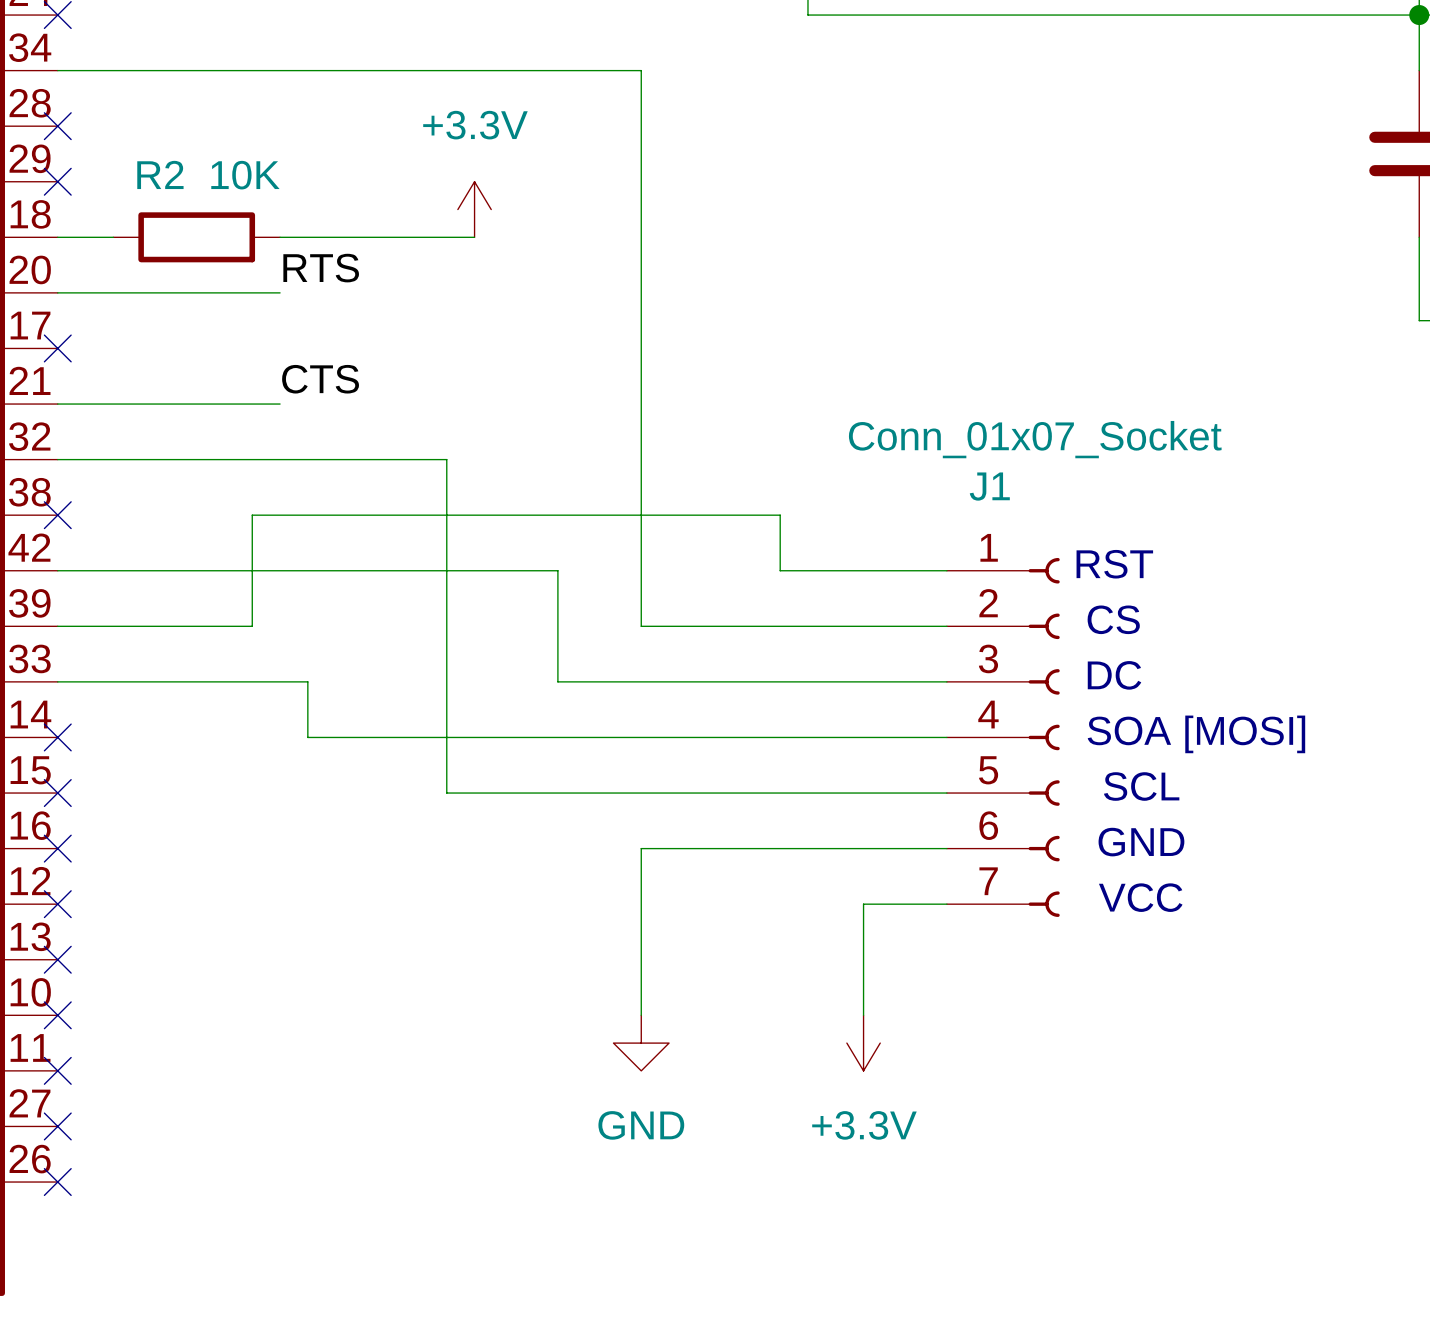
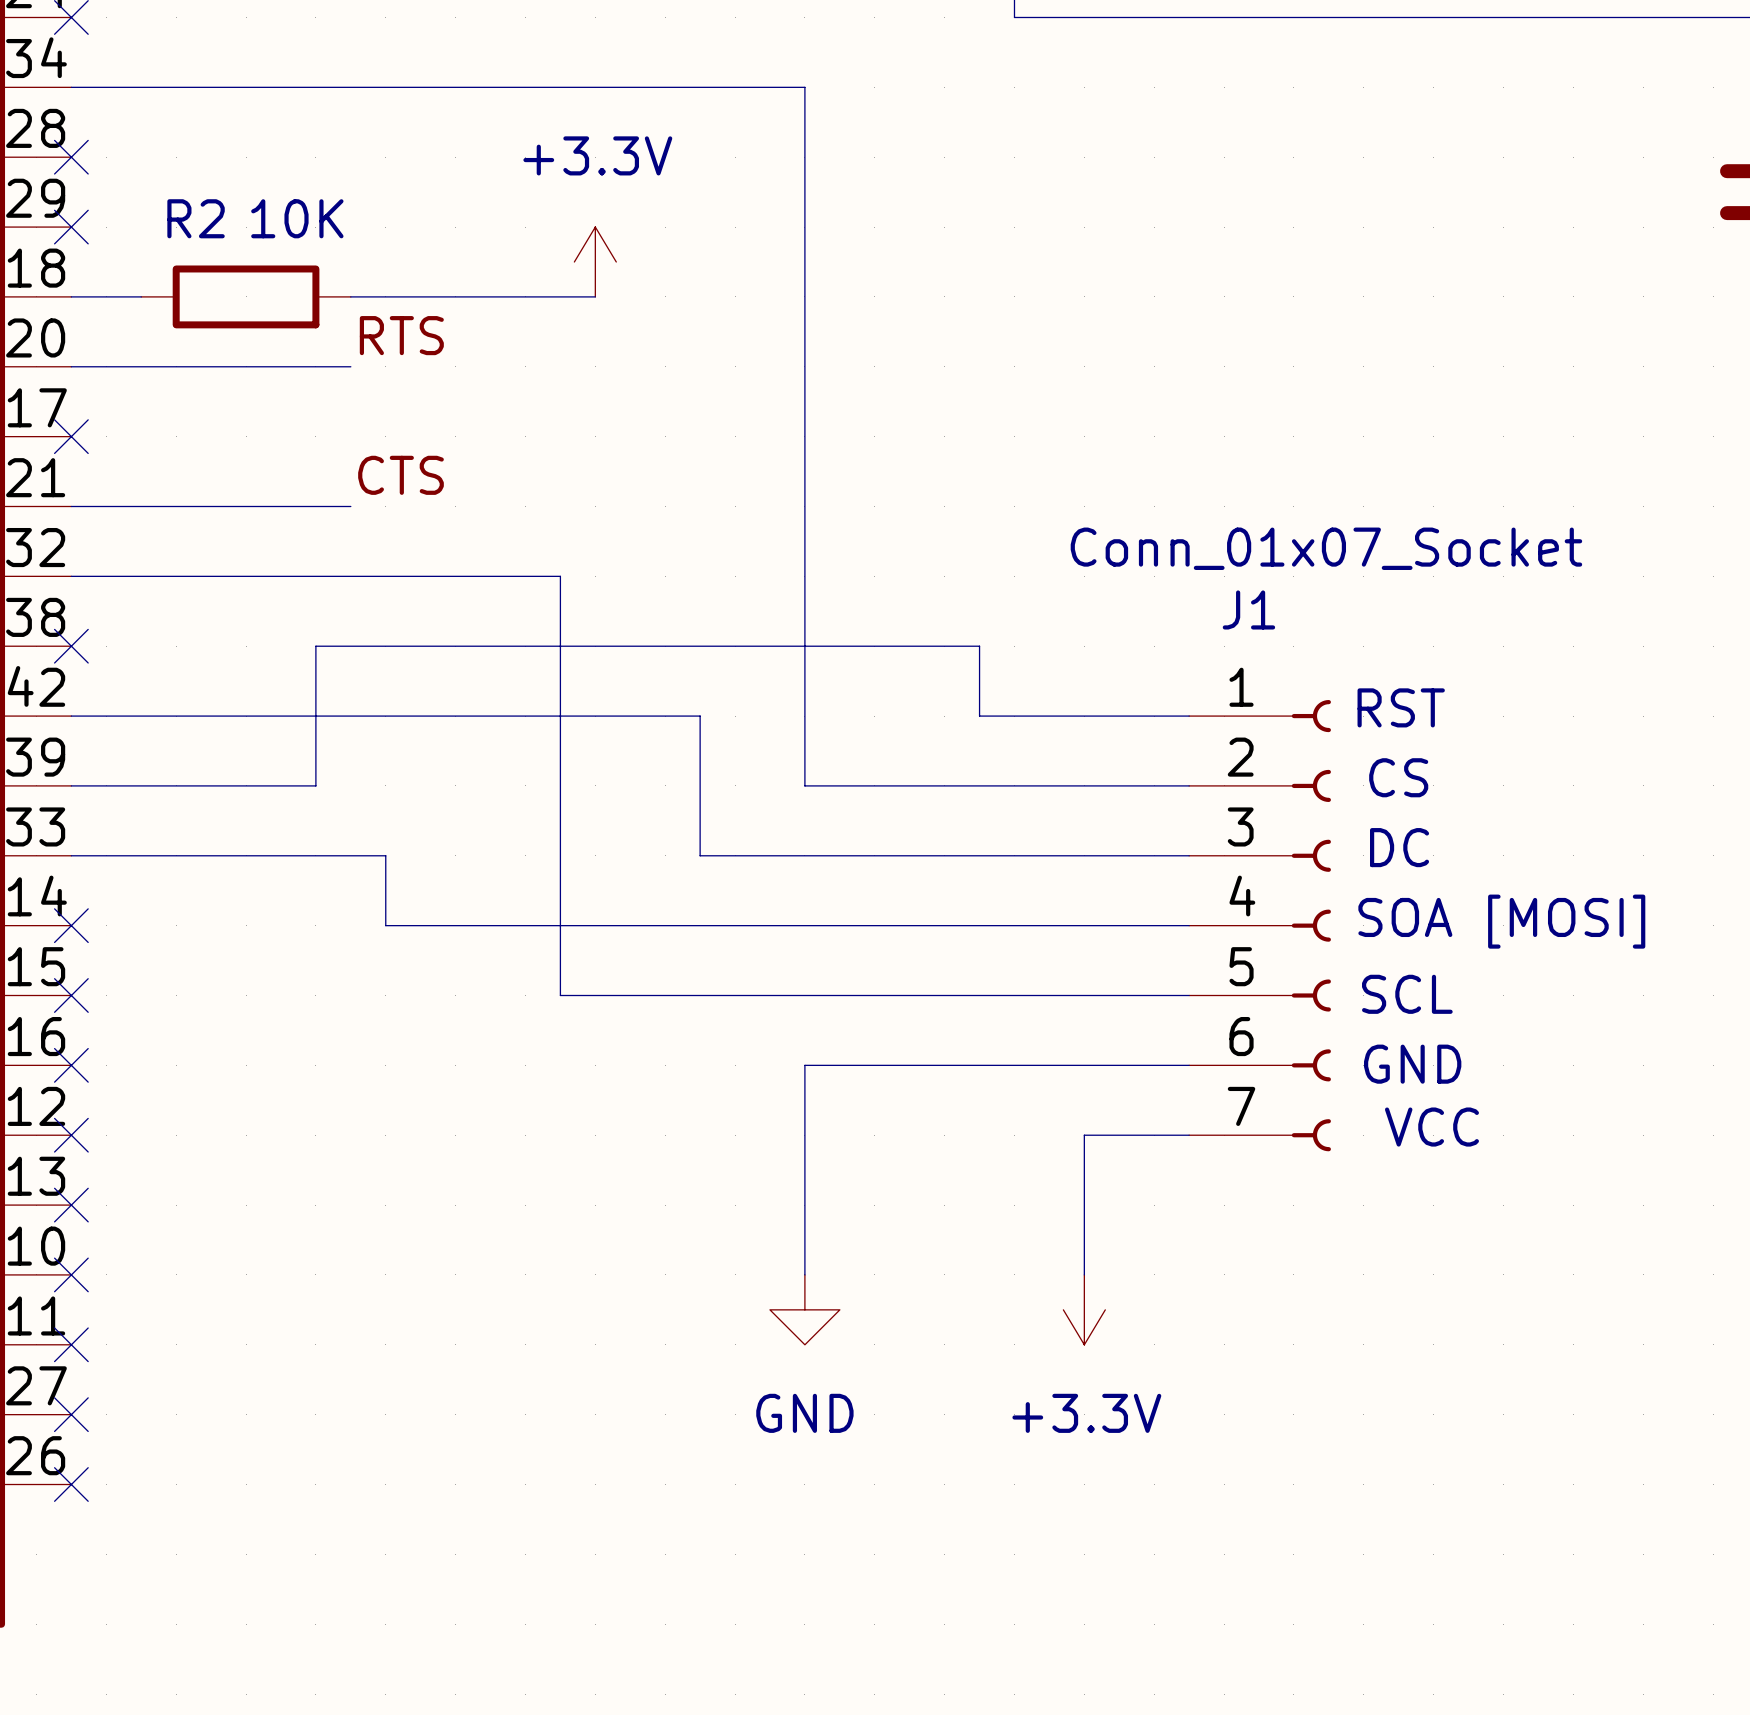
text position: SCL (1141, 786) -> SCL (1407, 994)
text position: GND (1141, 842) -> GND (1412, 1064)

